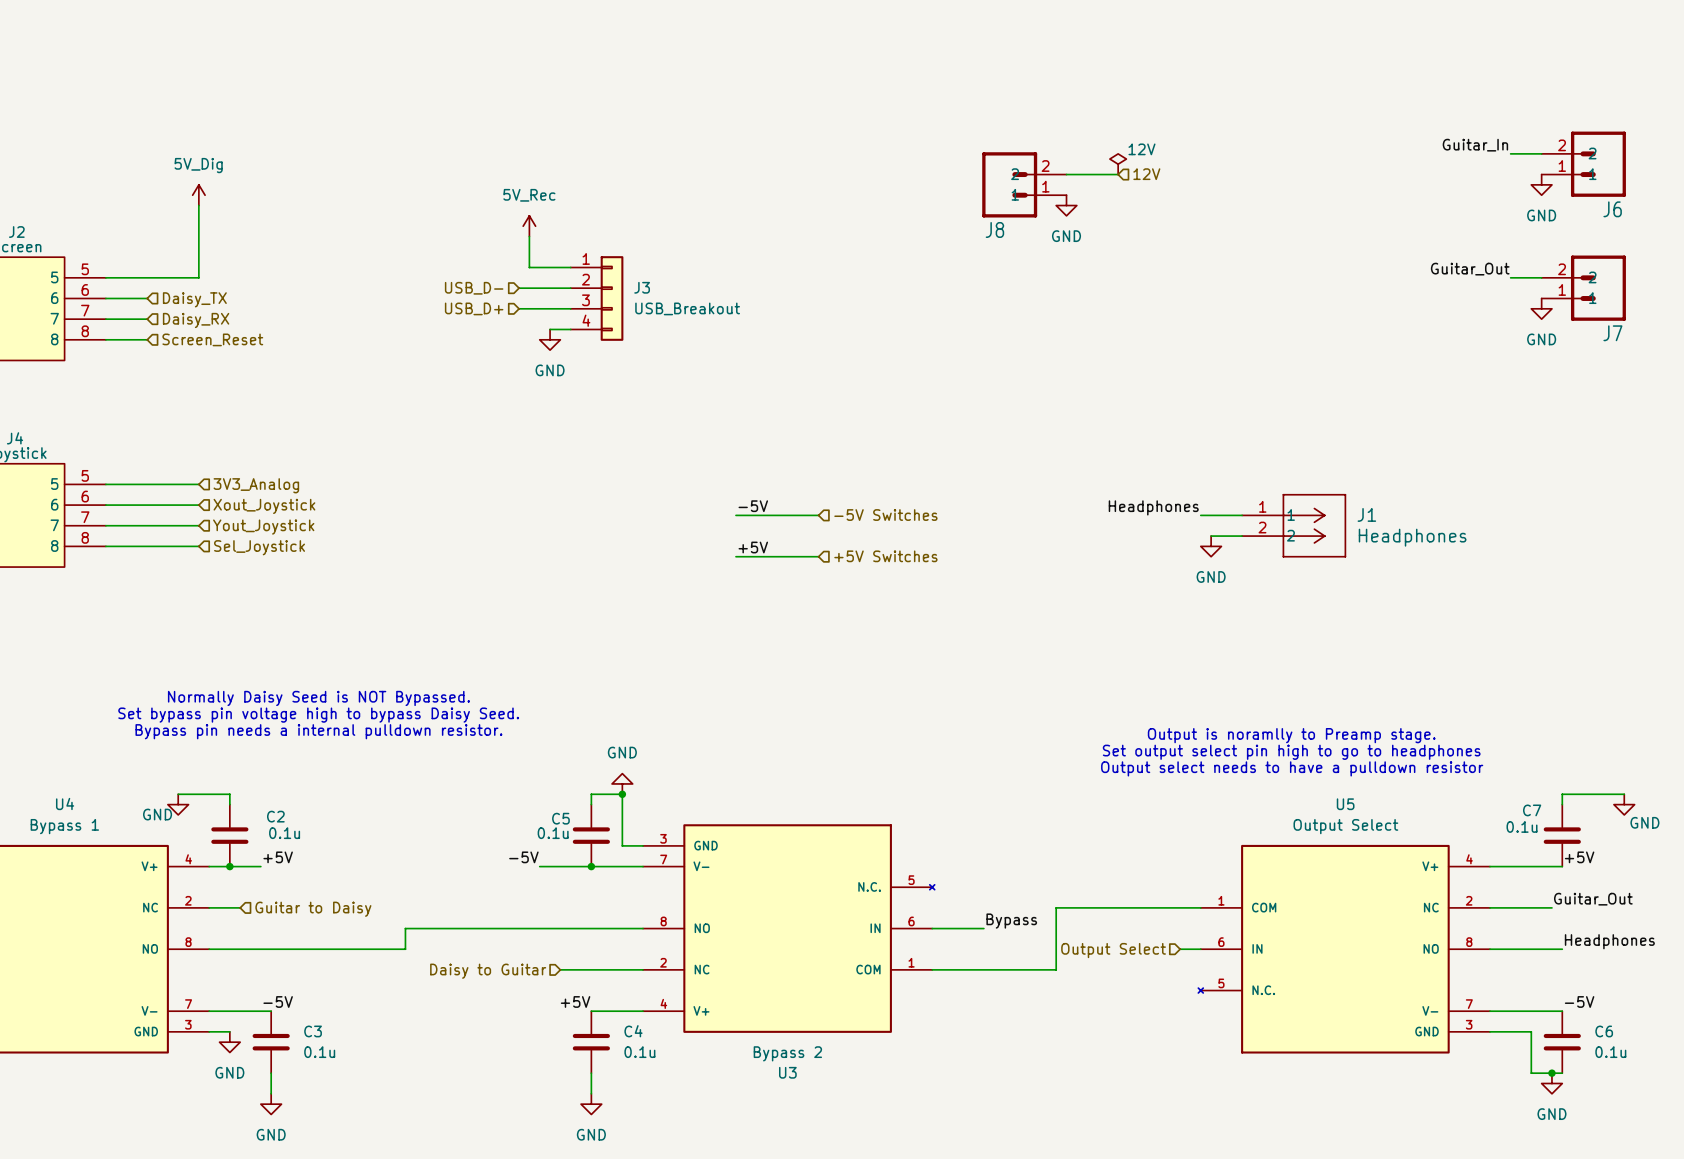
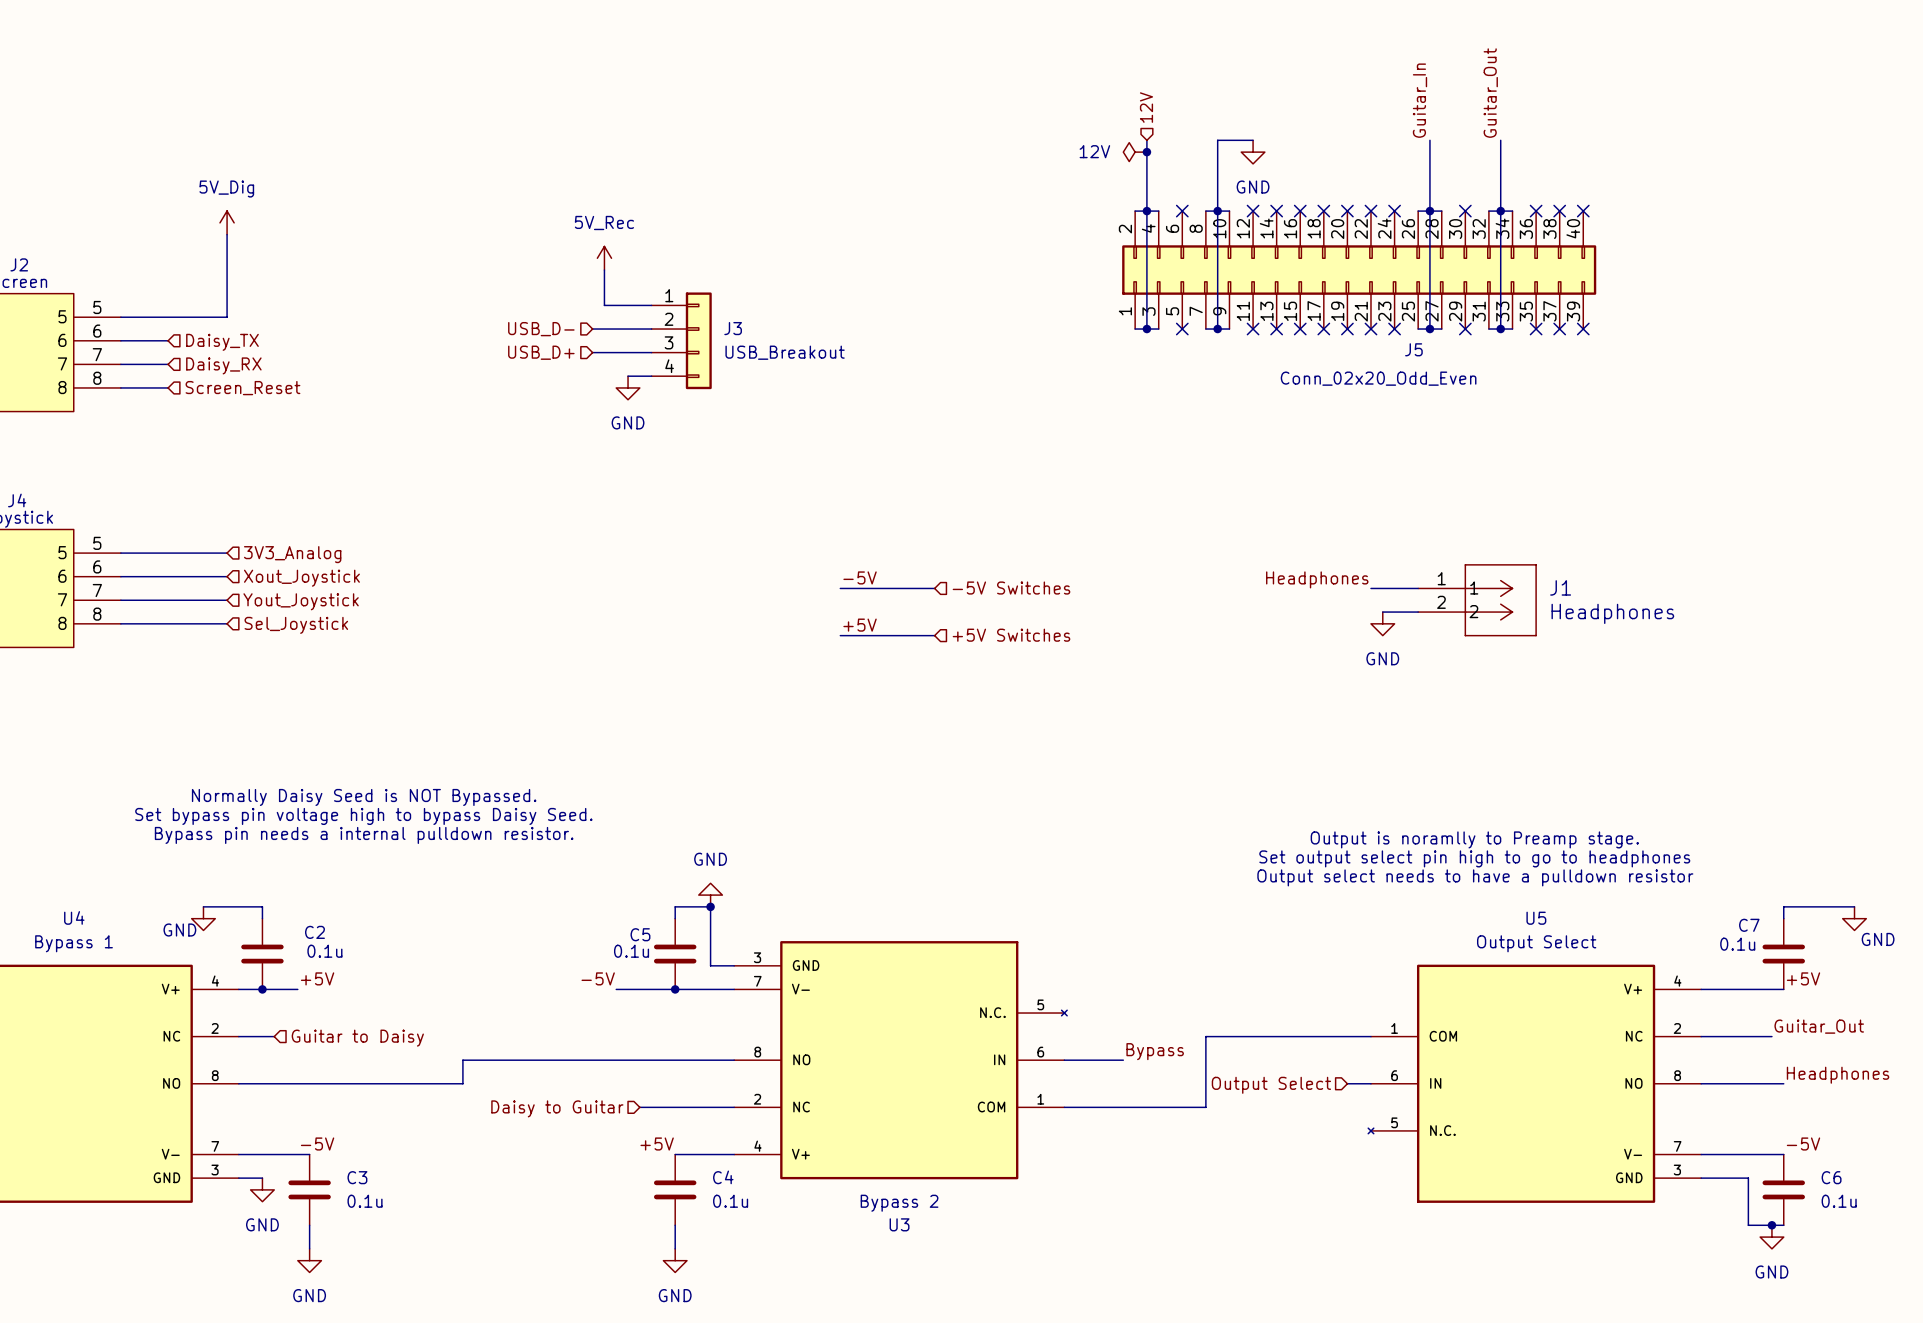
label: none -> Guitar_Out (1490, 93)
label: none -> Guitar_In (1419, 100)
wire: none -> (1146, 140) (1146, 329)
wire: none -> (1253, 140) (1217, 140) (1217, 329)
wire: none -> (1429, 140) (1429, 329)
wire: none -> (1500, 140) (1500, 329)
junction: none -> (1146, 152)
label: Guitar_In (1475, 145) -> none
power symbol text position: 12V (1141, 149) -> 12V (1094, 151)
wire: (1510, 153) (1541, 153) -> none
power symbol rotation: 0° (1118, 164) -> 90° counterclockwise (1135, 152)
power symbol position: 12V (1118, 164) -> 12V (1135, 152)
J6: (1583, 164) -> none
wire: (1066, 174) (1118, 174) -> none
hierarchical label rotation: 0° (1146, 174) -> 90° counterclockwise (1146, 107)
hierarchical label position: 12V (1146, 174) -> 12V (1146, 107)
wire: none -> (1135, 211) (1158, 211)
junction: none -> (1146, 211)
J8: (1024, 184) -> none
no-connect mark: none -> (1182, 211)
wire: none -> (1205, 211) (1229, 211)
junction: none -> (1217, 211)
no-connect mark: none -> (1253, 211)
no-connect mark: none -> (1276, 211)
no-connect mark: none -> (1300, 211)
no-connect mark: none -> (1323, 211)
no-connect mark: none -> (1347, 211)
no-connect mark: none -> (1370, 211)
no-connect mark: none -> (1394, 211)
wire: none -> (1418, 211) (1441, 211)
junction: none -> (1429, 211)
no-connect mark: none -> (1465, 211)
wire: none -> (1488, 211) (1512, 211)
junction: none -> (1500, 211)
no-connect mark: none -> (1536, 211)
no-connect mark: none -> (1559, 211)
no-connect mark: none -> (1583, 211)
power symbol: GND (1541, 184) -> none
power symbol position: GND (1066, 205) -> GND (1253, 152)
J5: none -> Conn_02x20_Odd_Even (1359, 270)
label: Guitar_Out (1470, 269) -> none
wire: (1510, 277) (1541, 277) -> none
wire: none -> (1135, 329) (1158, 329)
junction: none -> (1146, 329)
no-connect mark: none -> (1182, 329)
wire: none -> (1205, 329) (1229, 329)
junction: none -> (1217, 329)
no-connect mark: none -> (1253, 329)
no-connect mark: none -> (1276, 329)
no-connect mark: none -> (1300, 329)
no-connect mark: none -> (1323, 329)
no-connect mark: none -> (1347, 329)
no-connect mark: none -> (1370, 329)
no-connect mark: none -> (1394, 329)
wire: none -> (1418, 329) (1441, 329)
junction: none -> (1429, 329)
no-connect mark: none -> (1465, 329)
wire: none -> (1488, 329) (1512, 329)
junction: none -> (1500, 329)
no-connect mark: none -> (1536, 329)
no-connect mark: none -> (1559, 329)
no-connect mark: none -> (1583, 329)
J7: (1583, 288) -> none
power symbol: GND (1541, 308) -> none

